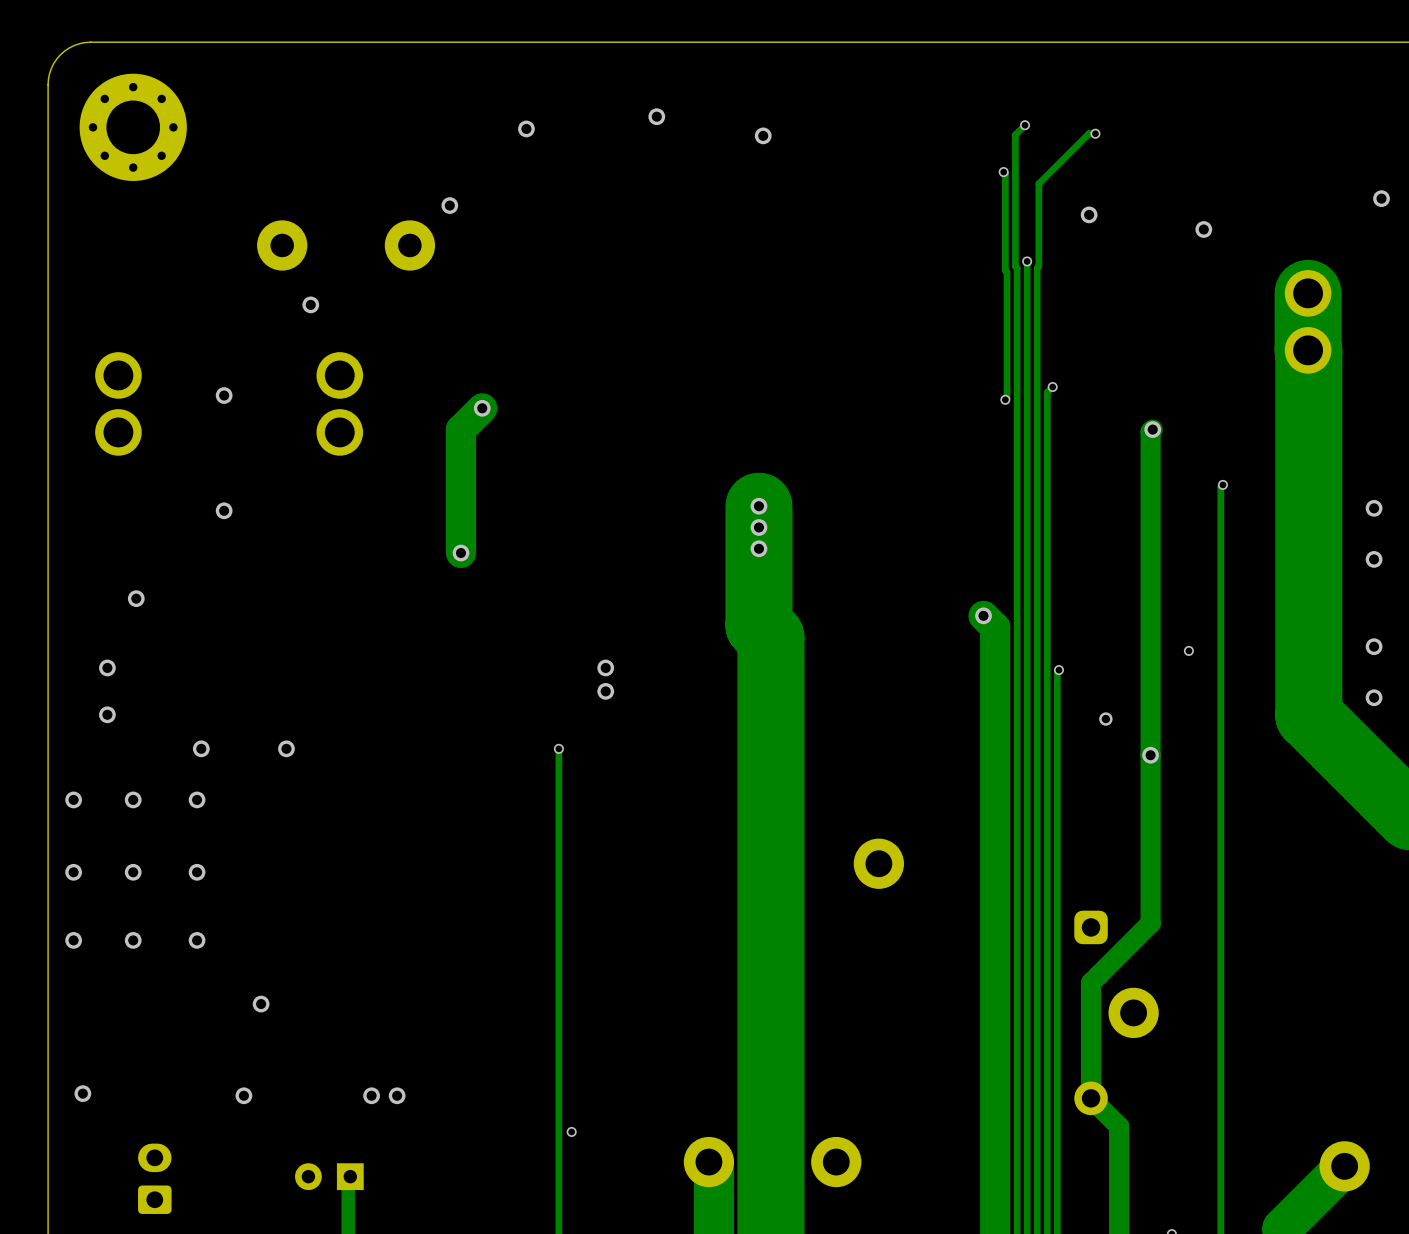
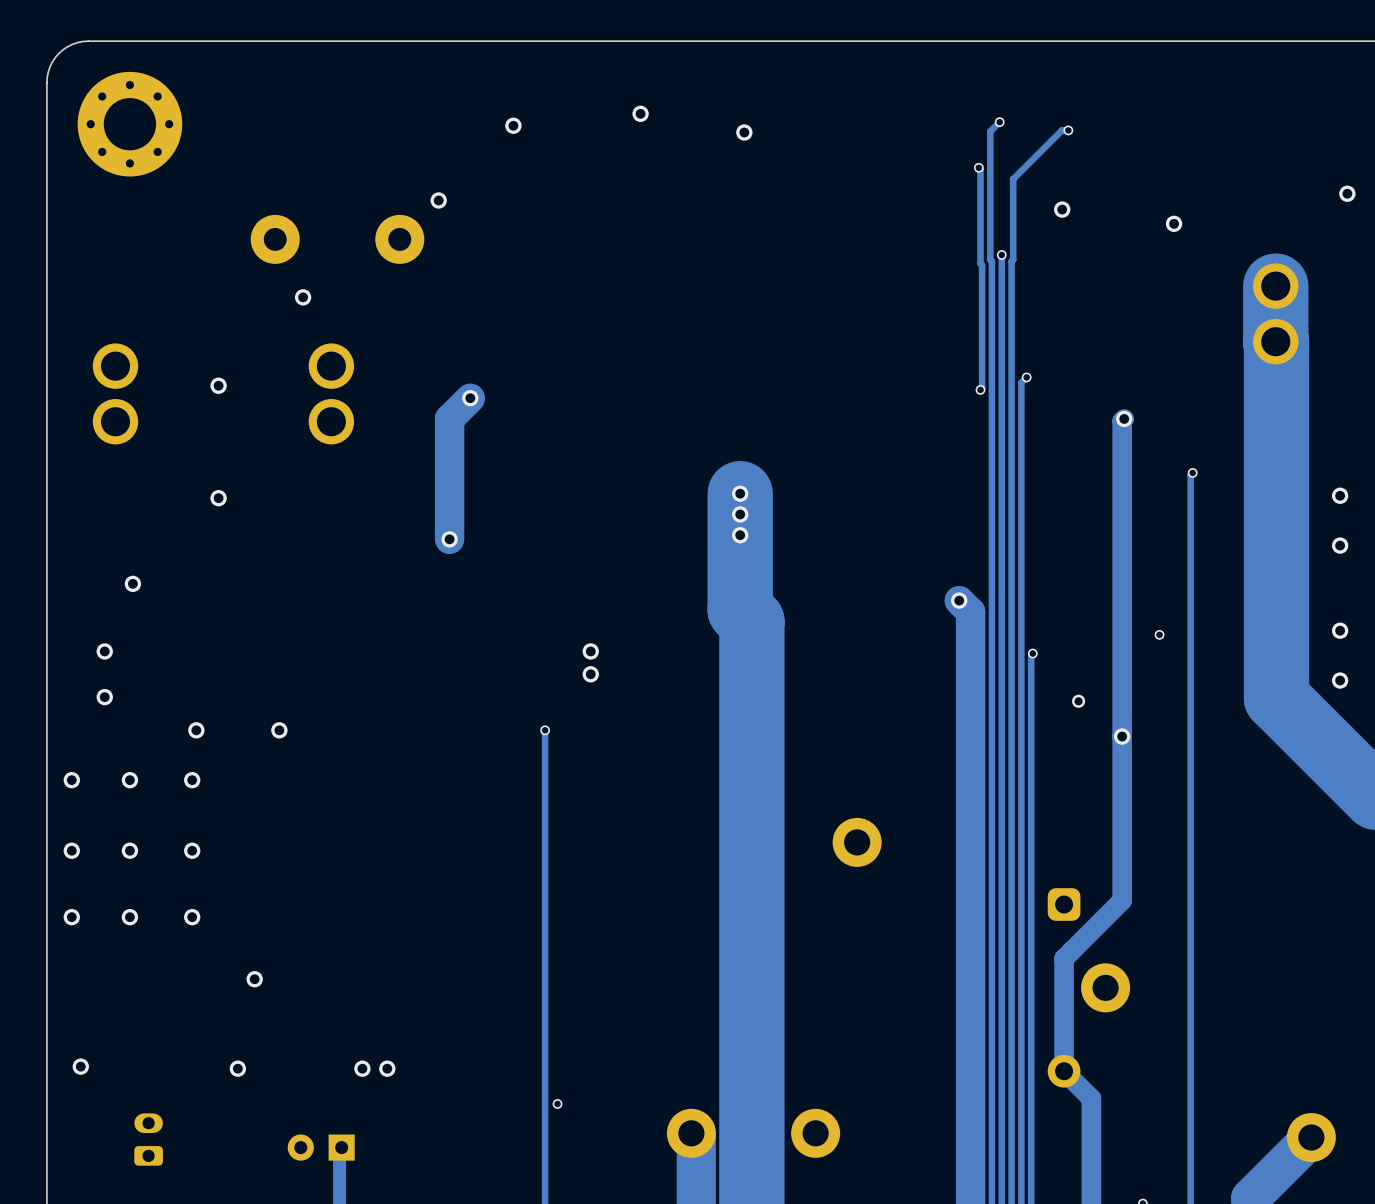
part footprint: [138, 1143, 172, 1214] -> [134, 1113, 163, 1166]

